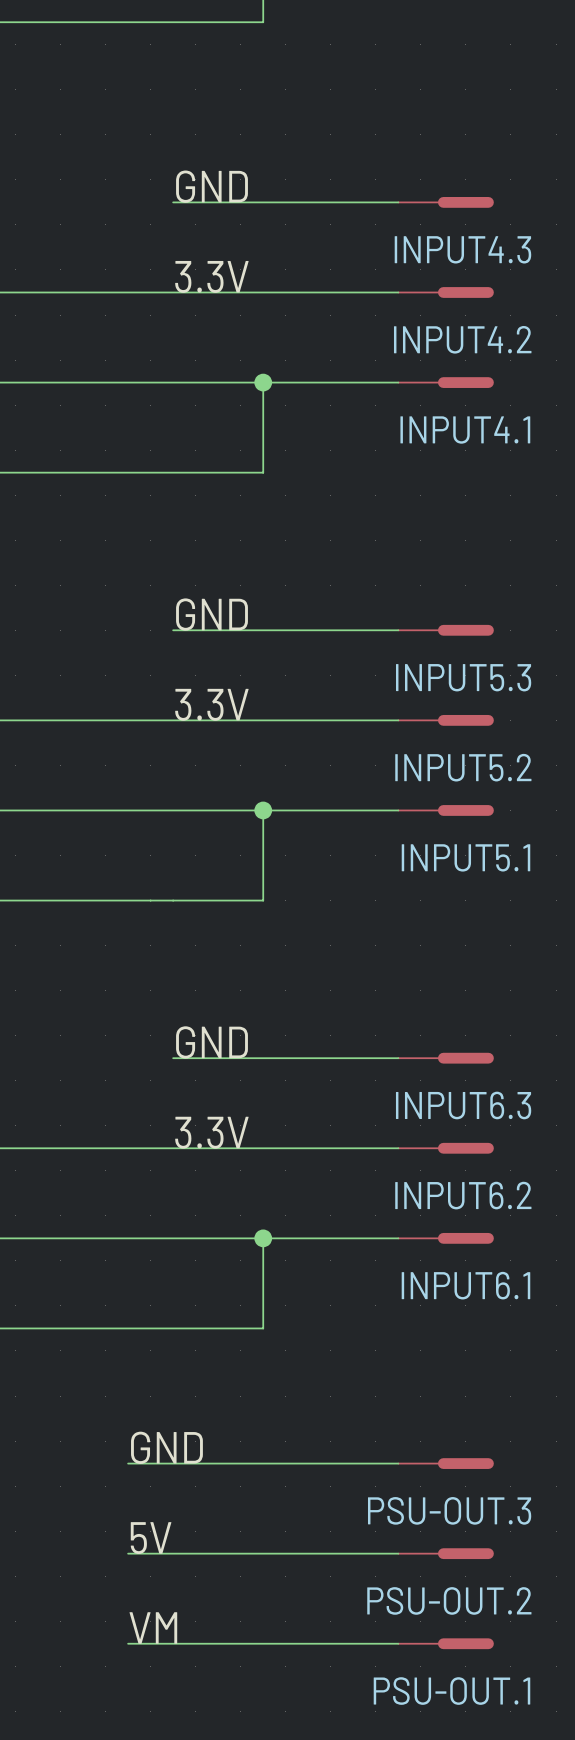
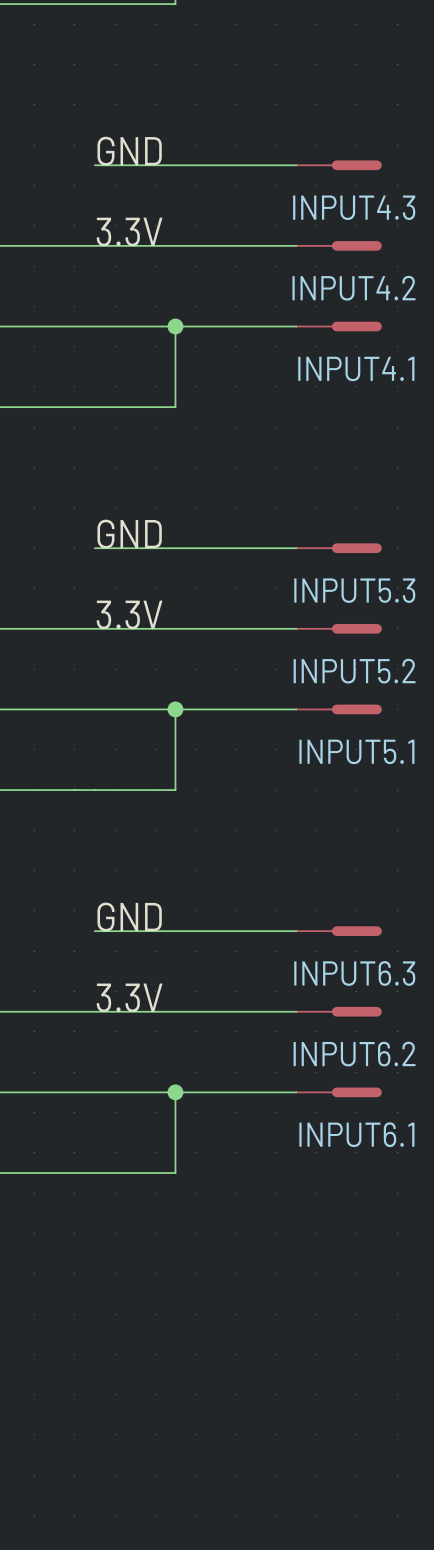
label: GND (166, 1447) -> none
wire: (128, 1463) (398, 1463) -> none
PSU-OUT.3: (446, 1463) -> none
label: 5V (151, 1538) -> none
wire: (128, 1553) (398, 1553) -> none
PSU-OUT.2: (446, 1553) -> none
label: VM (153, 1627) -> none
wire: (128, 1643) (398, 1643) -> none
PSU-OUT.1: (446, 1643) -> none

